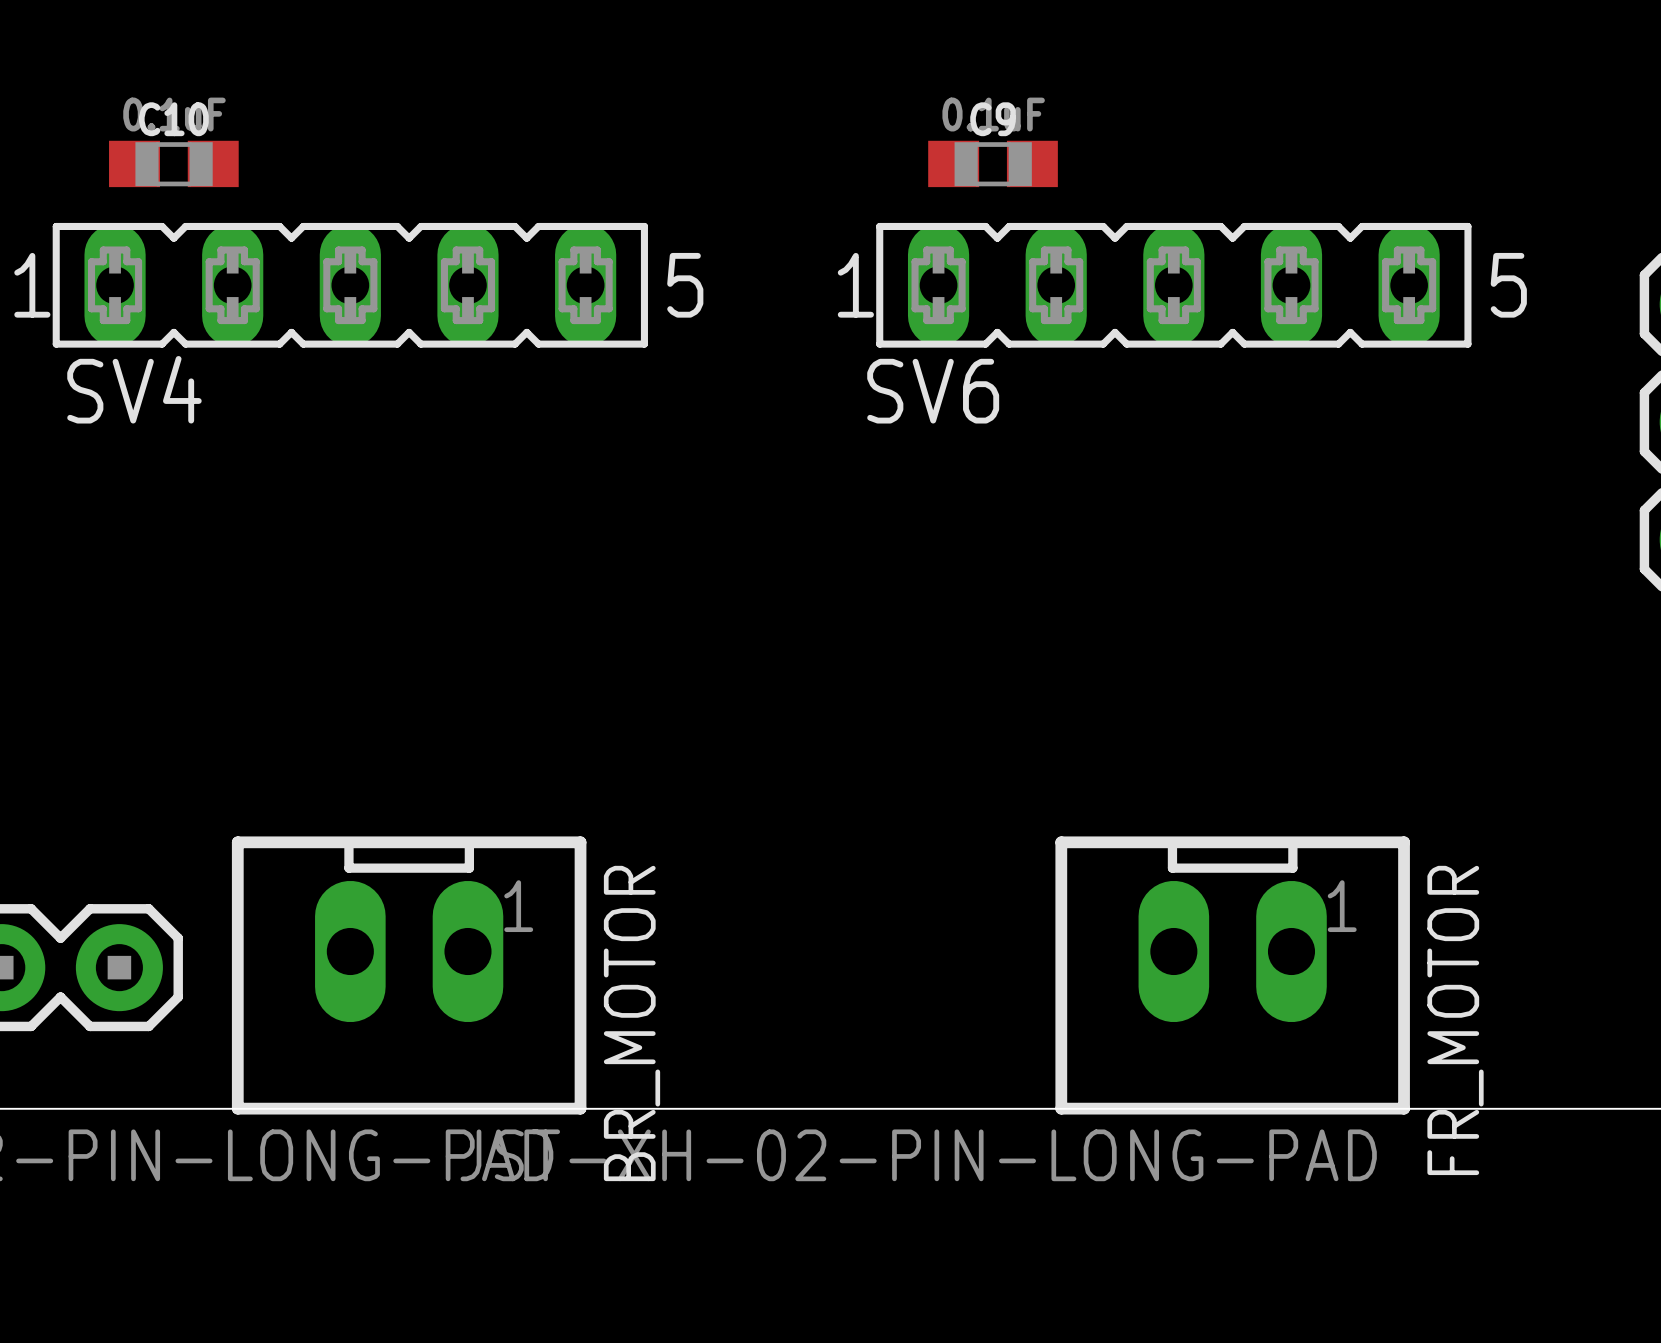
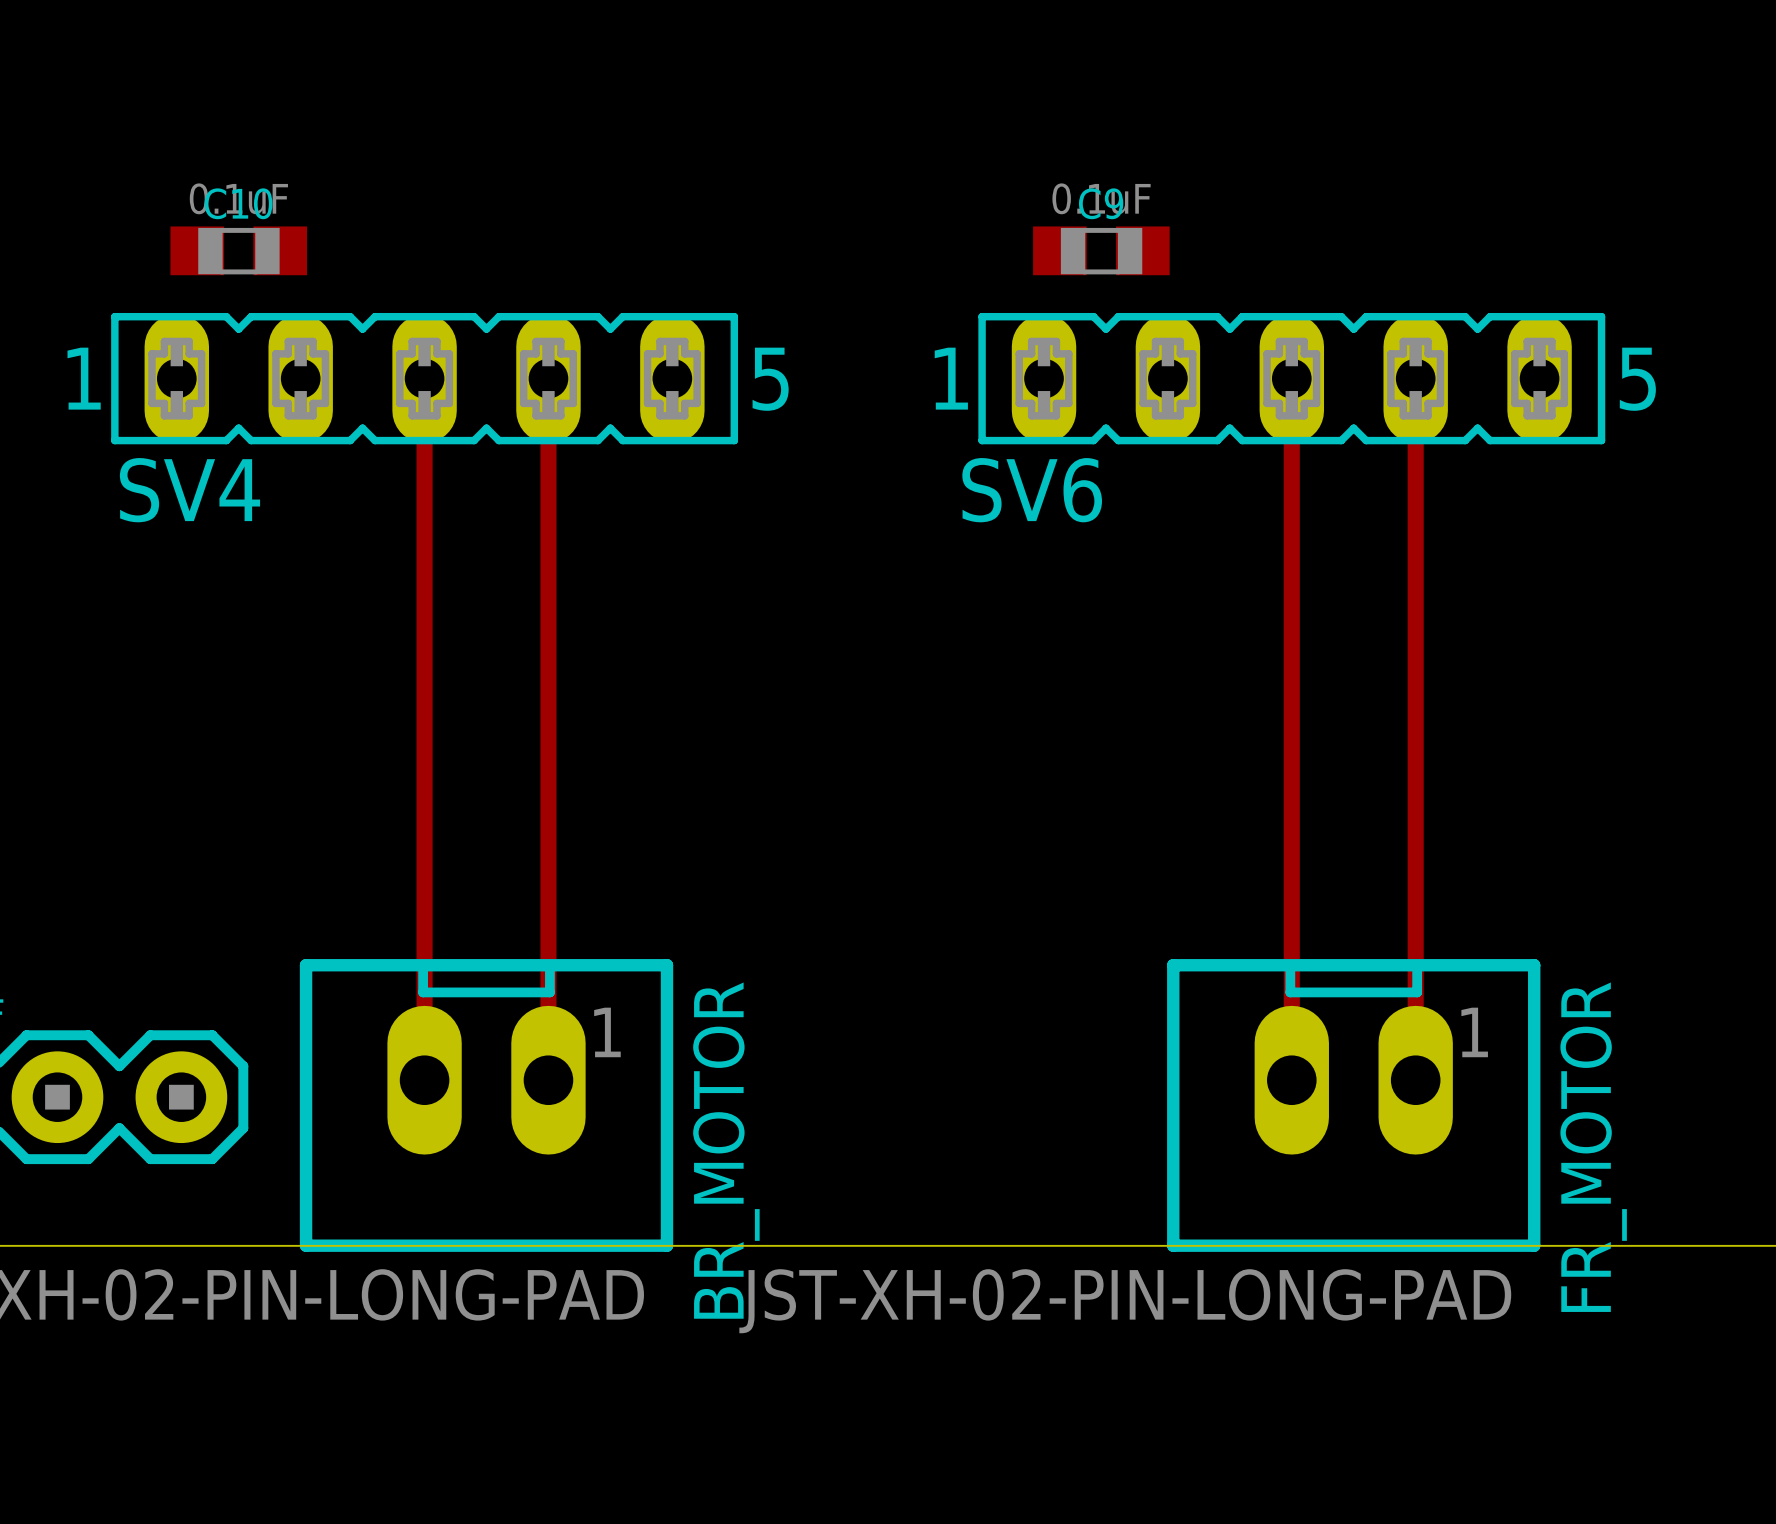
top track: none -> (424, 378) (424, 1080)
top track: none -> (548, 378) (548, 1080)
top track: none -> (1291, 378) (1291, 1080)
top track: none -> (1415, 378) (1415, 1080)

